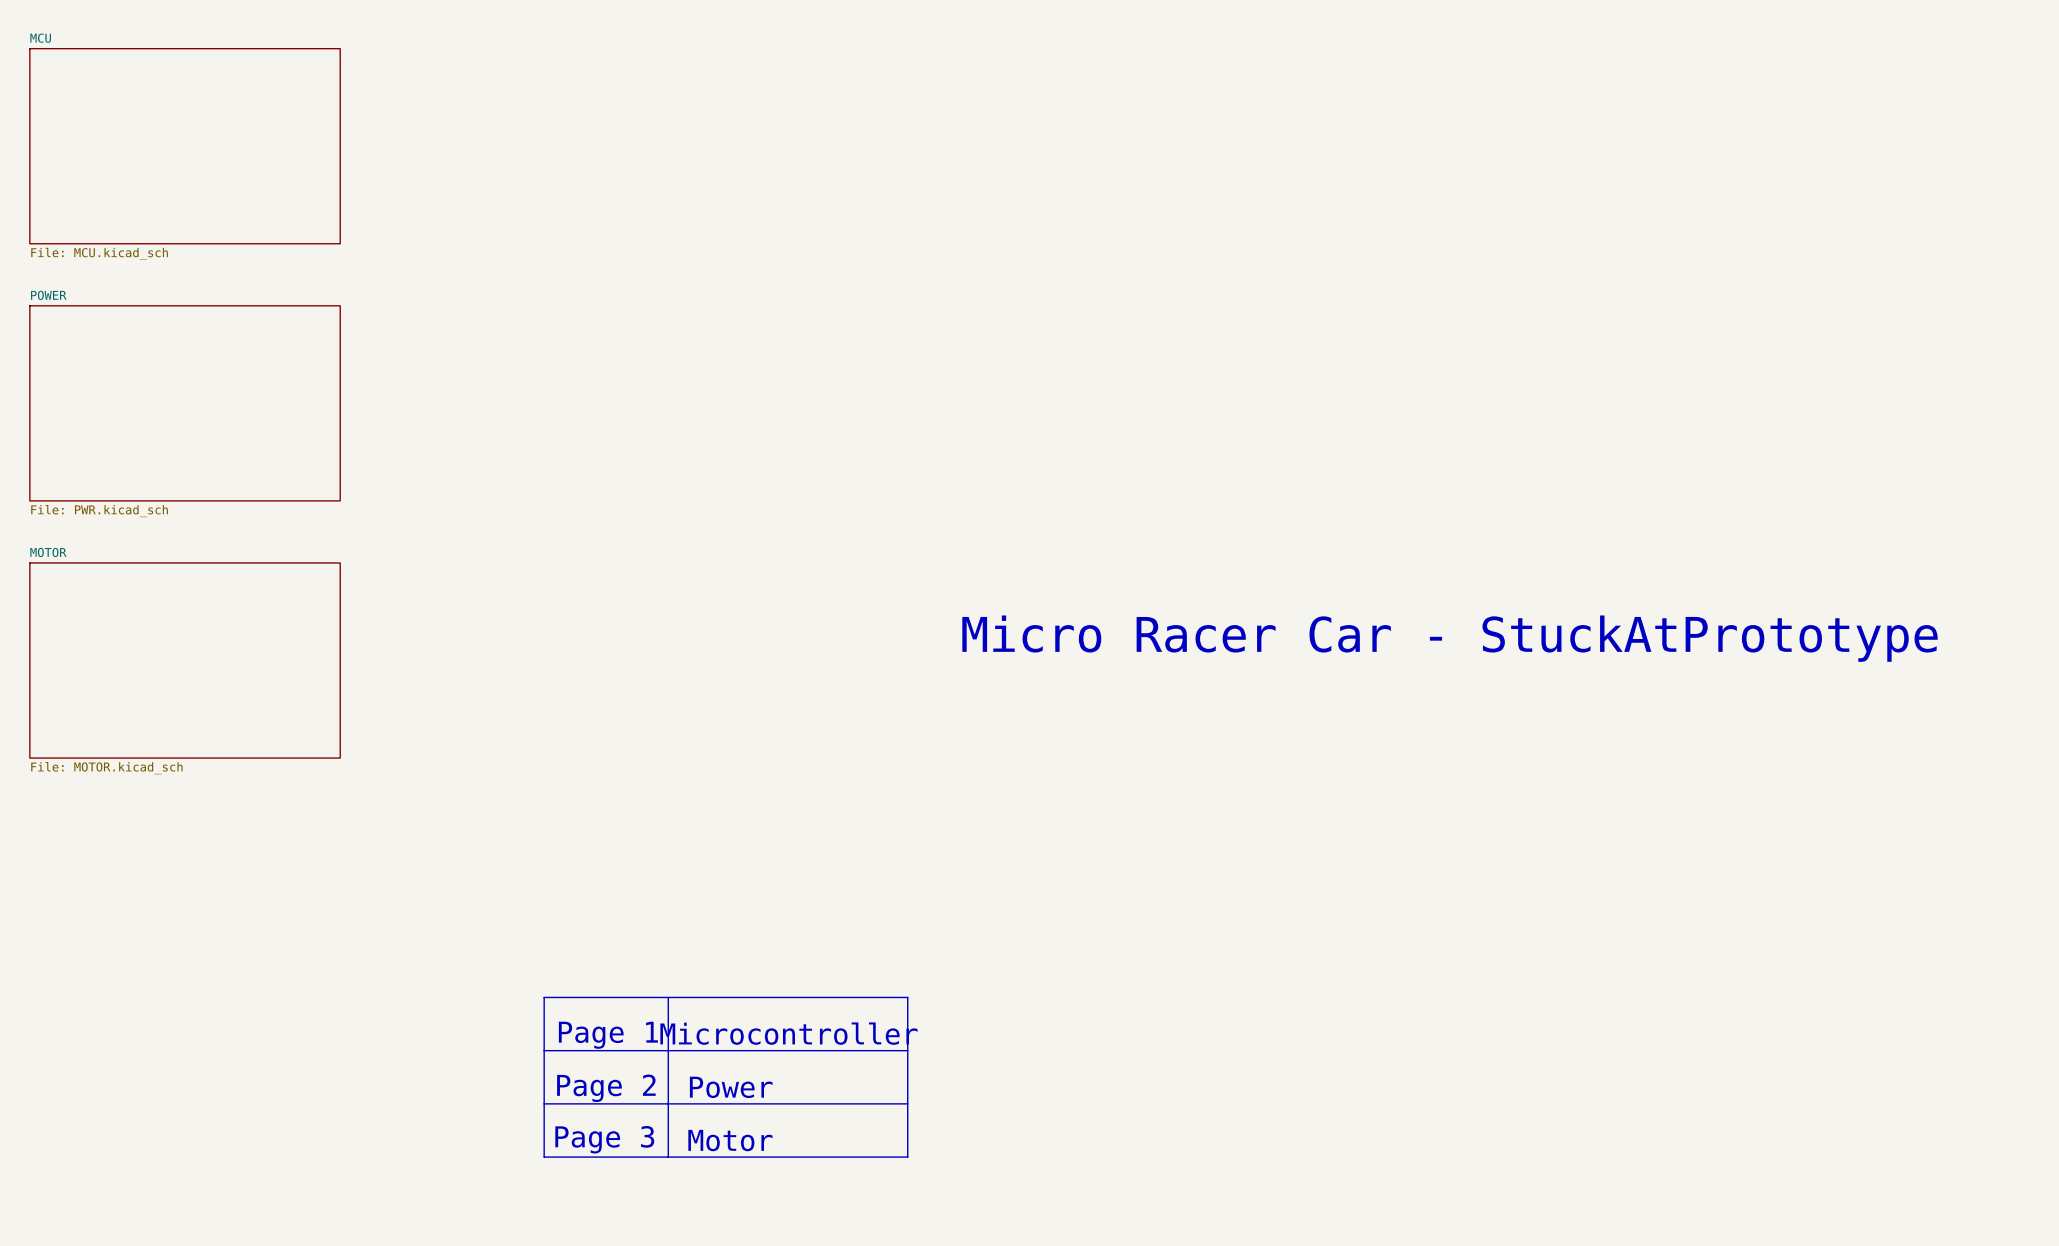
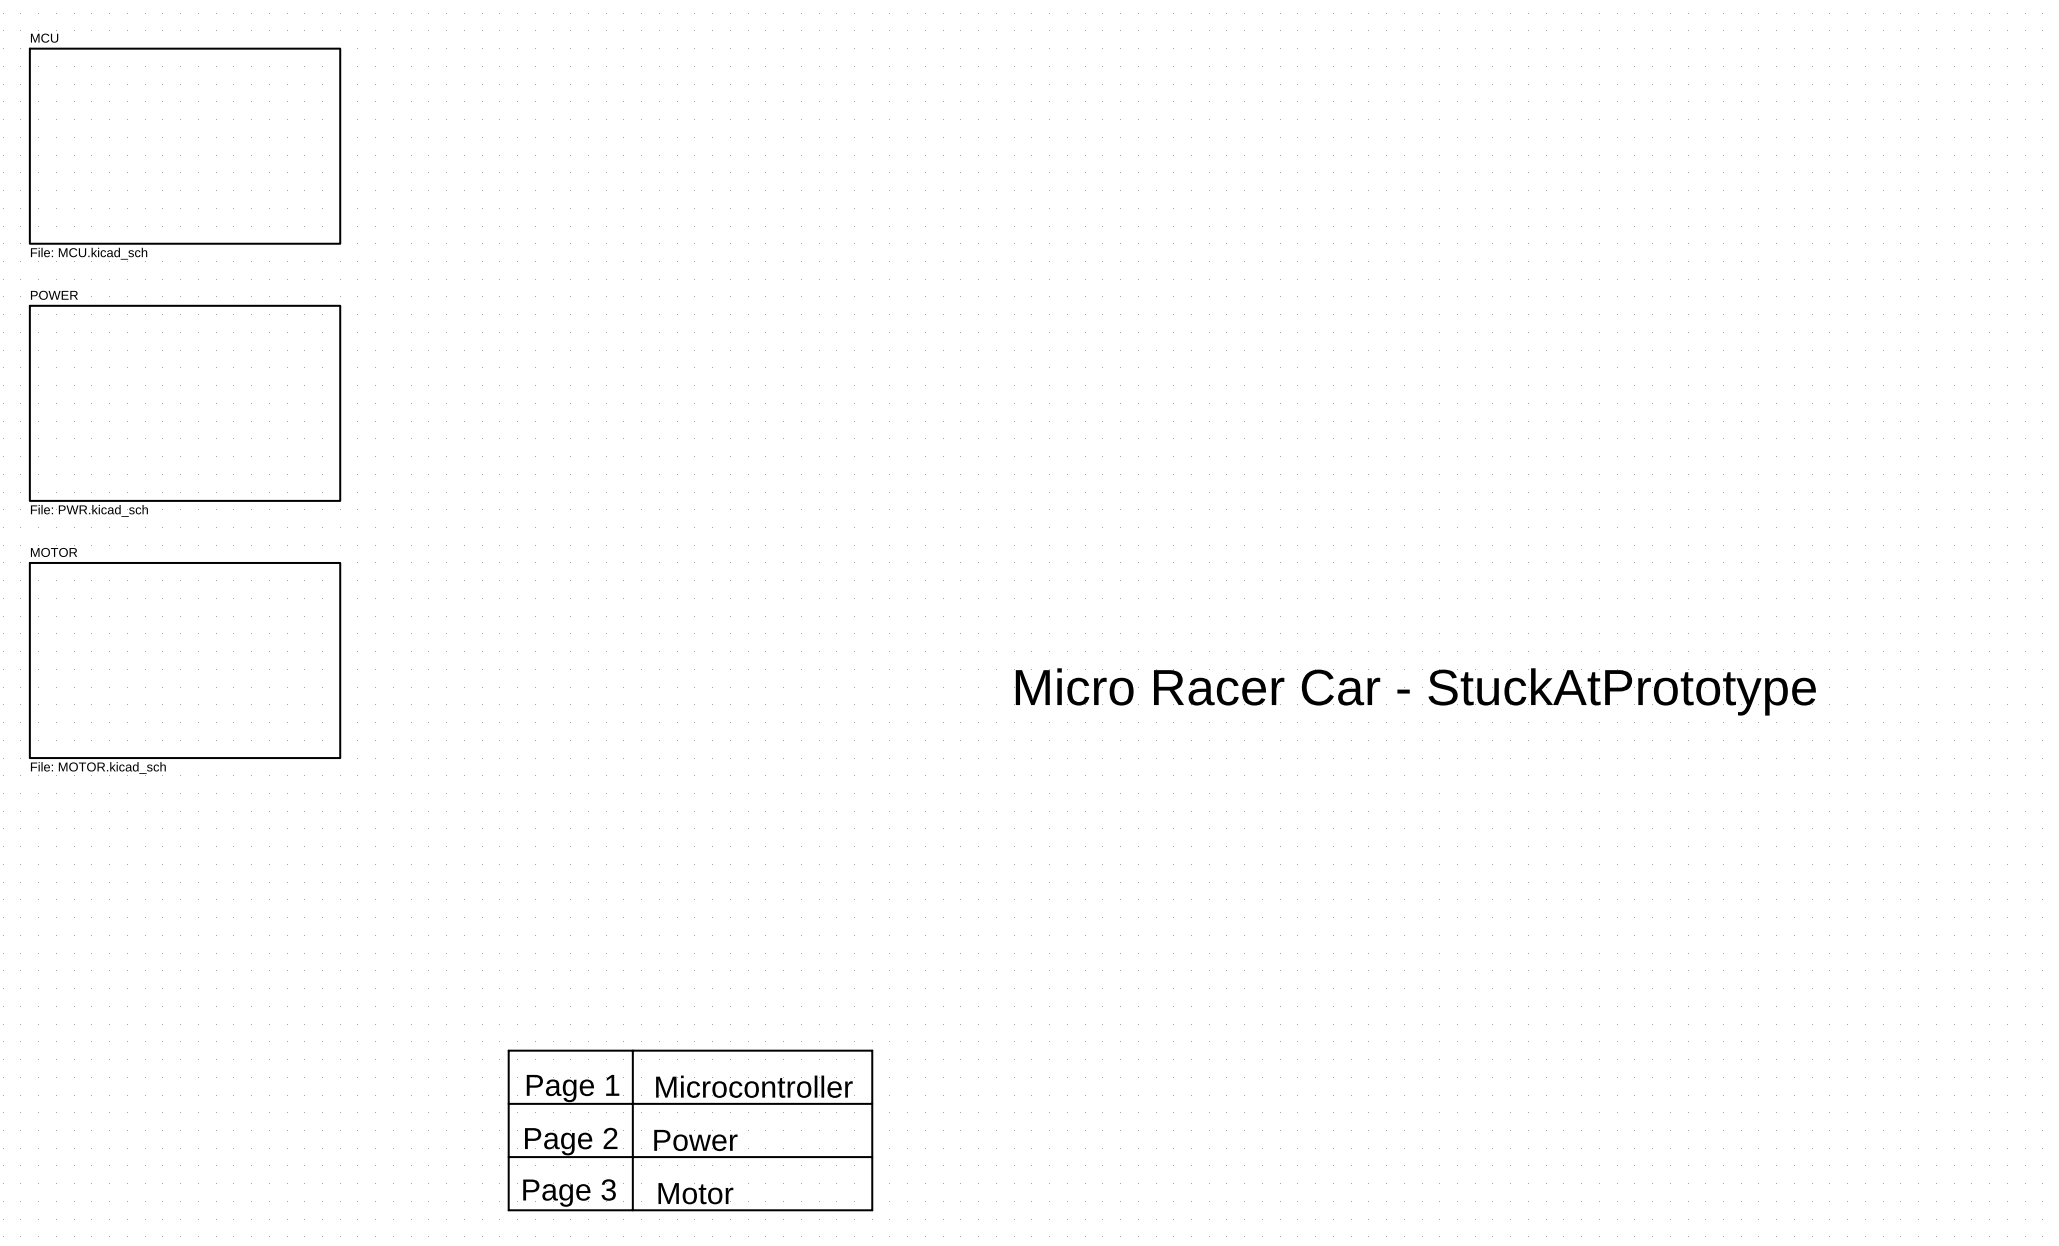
text position: Micro Racer Car - StuckAtPrototype (1450, 638) -> Micro Racer Car - StuckAtPrototype (1415, 691)
line: (668, 997) (668, 1157) -> (632, 1050) (632, 1210)
text position: Microcontroller (788, 1033) -> Microcontroller (754, 1086)
text position: Page 1 (608, 1035) -> Page 1 (573, 1088)
line: (872, 1050) (907, 1050) -> (872, 1050) (872, 1210) (508, 1210) (508, 1050) (544, 1050)
text position: Power (731, 1087) -> Power (695, 1140)
text position: Page 2 (606, 1088) -> Page 2 (571, 1141)
line: none -> (508, 1103) (544, 1103)
line: (872, 1103) (907, 1103) -> none
text position: Page 3 (604, 1139) -> Page 3 (569, 1193)
text position: Motor (730, 1140) -> Motor (695, 1193)
line: (544, 1157) (544, 997) (907, 997) (907, 1157) (872, 1157) -> (544, 1157) (508, 1157)

